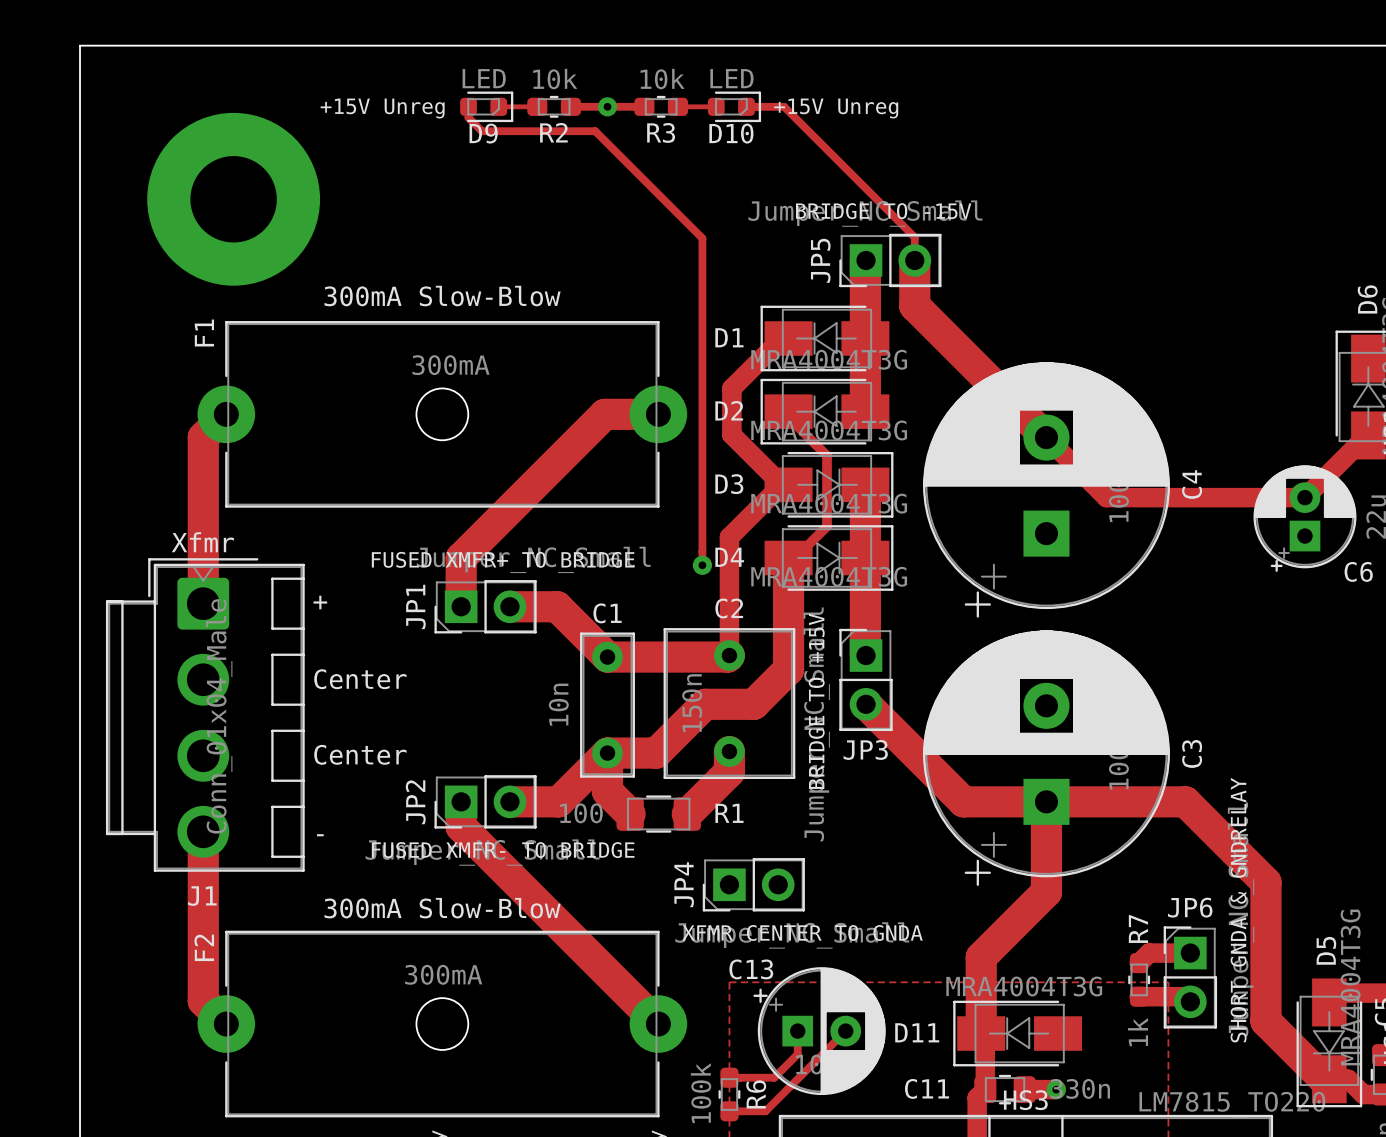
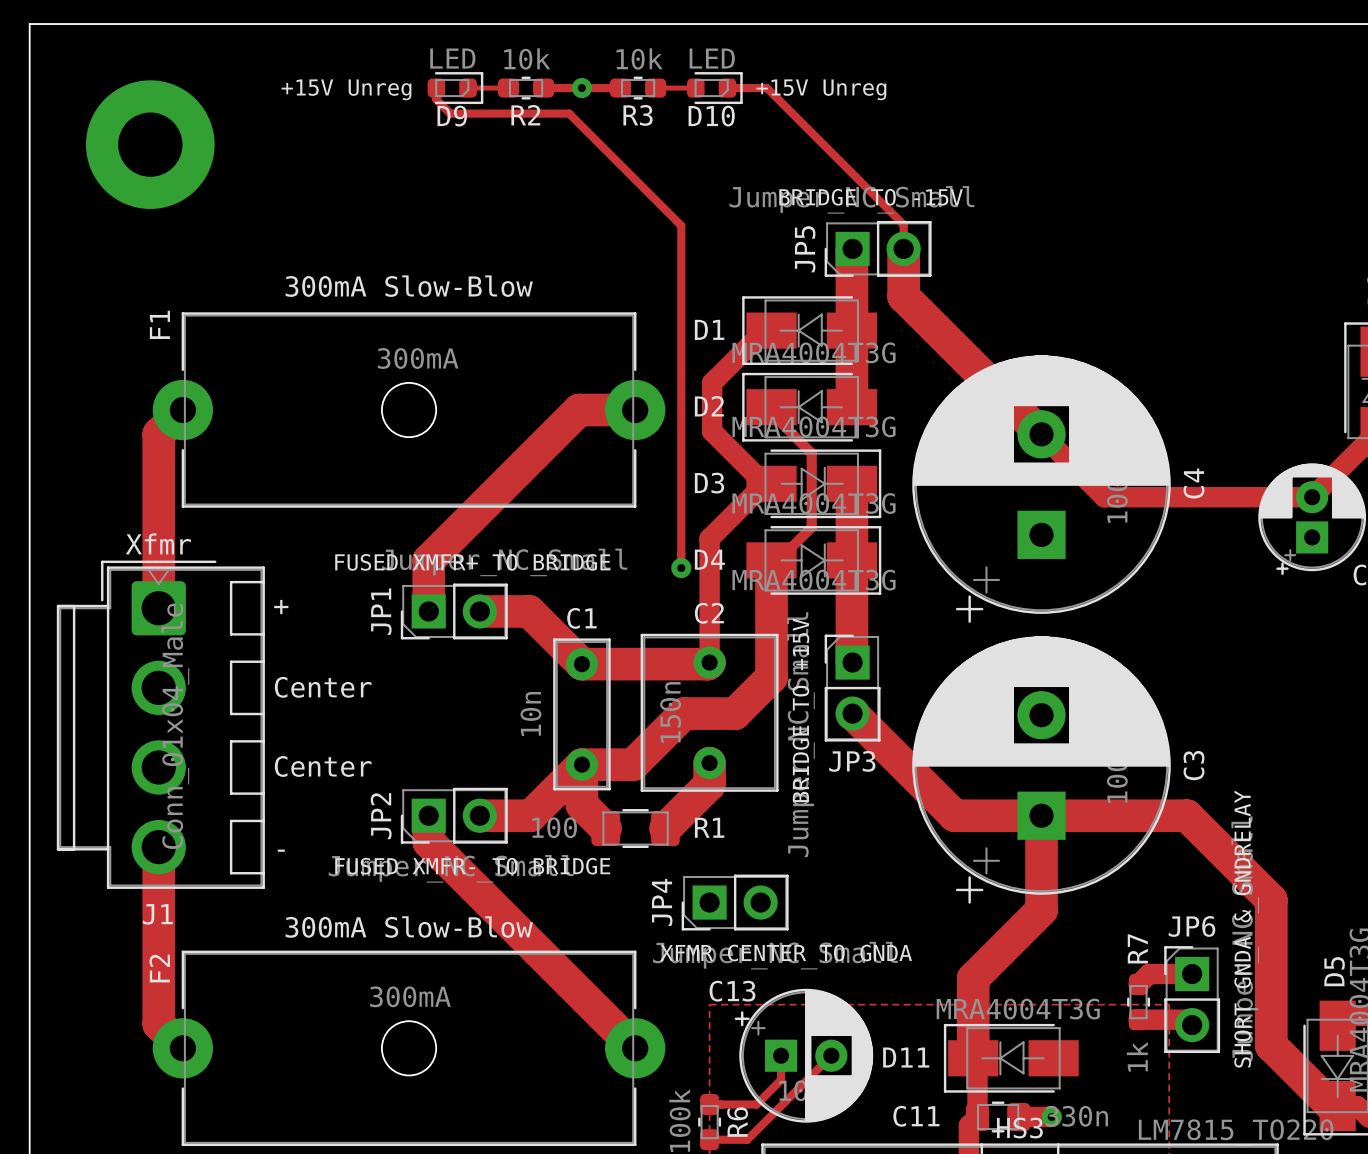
part: none -> (150, 144)
part: (233, 199) -> none

